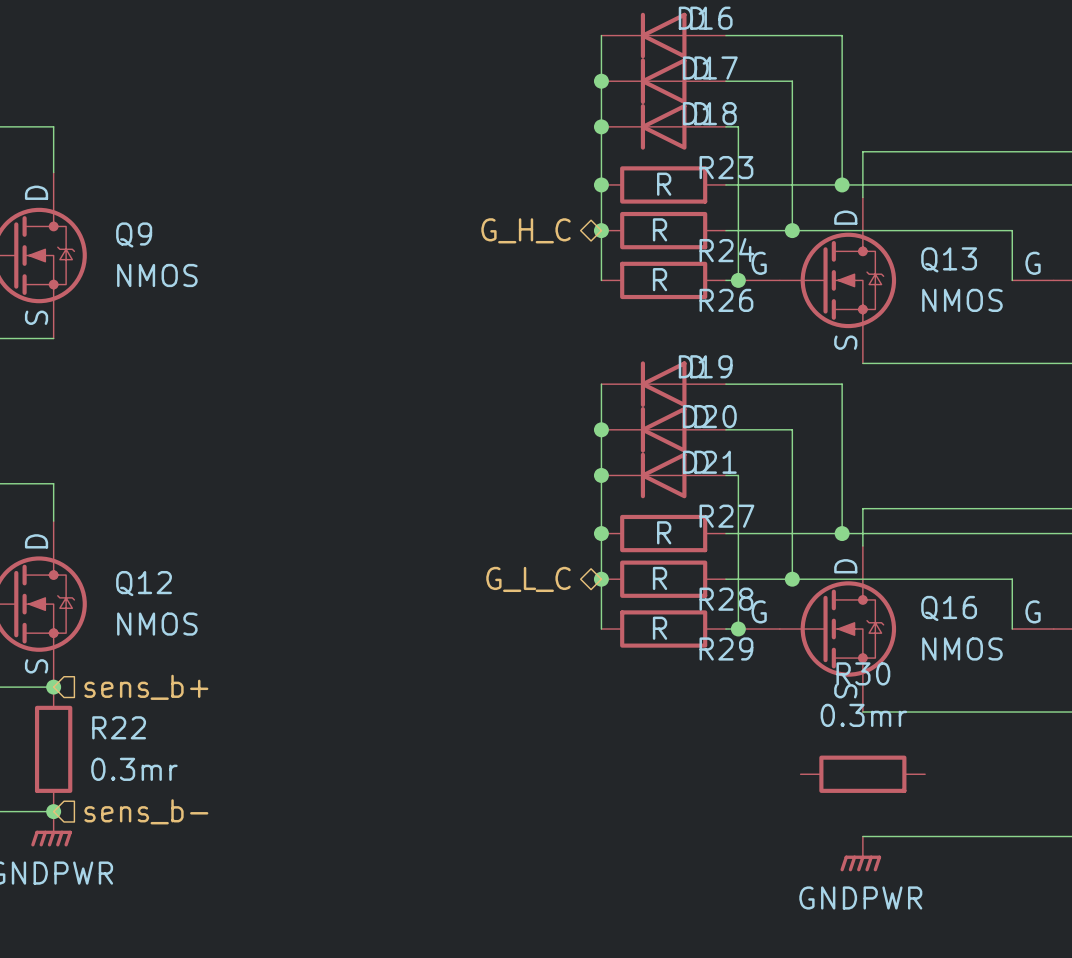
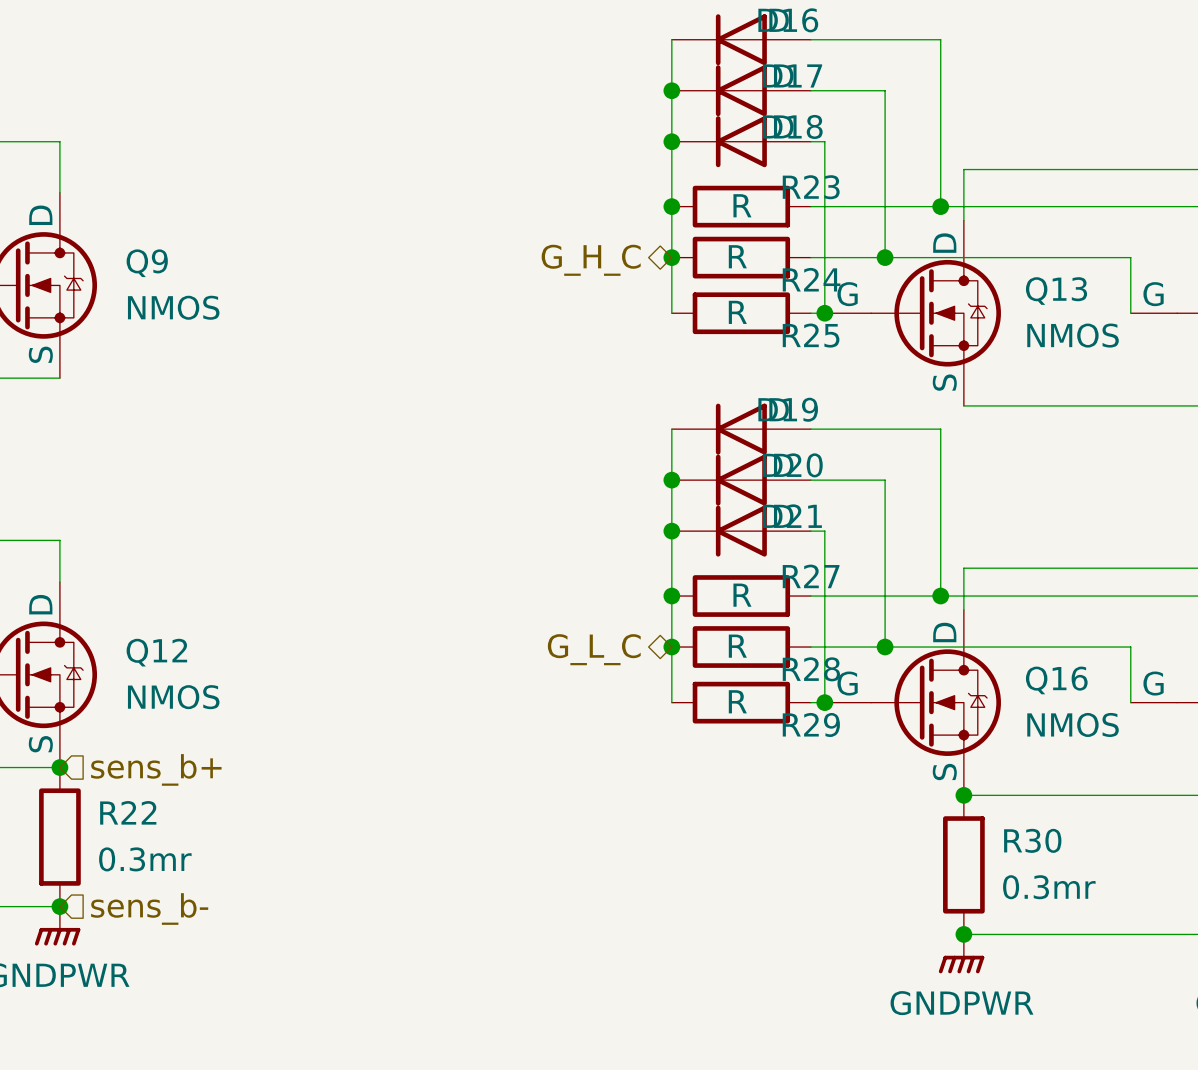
R26 name: R26 (726, 300) -> R25 (811, 335)
R30 name position: R30 (863, 673) -> R30 (1032, 840)
junction: none -> (963, 795)
R30 value position: 0.3mr (863, 715) -> 0.3mr (1049, 887)
R30 rotation: 0° (862, 774) -> 90° clockwise (963, 864)
junction: none -> (963, 934)

